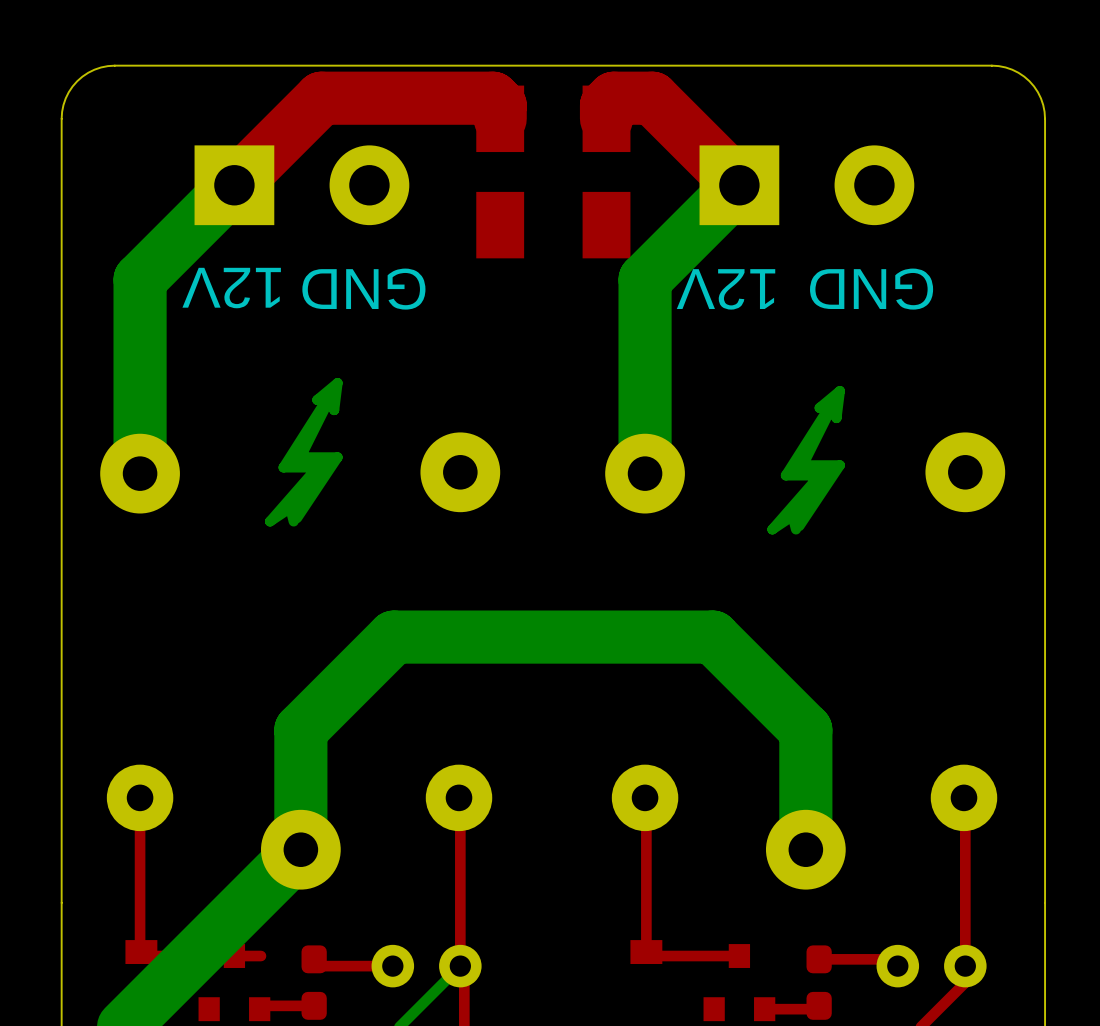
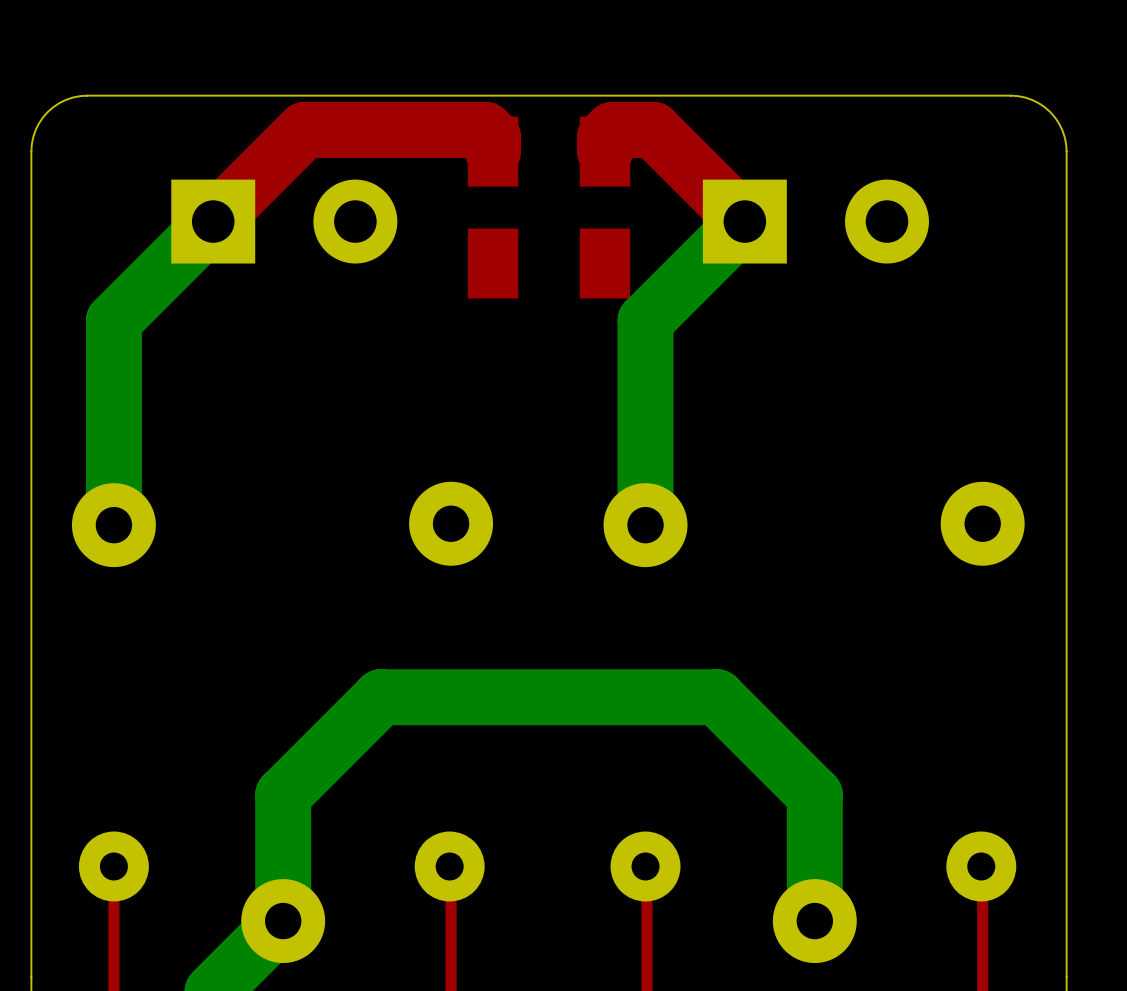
text: 12V (231, 288) -> none
text: GND (363, 289) -> none
text: 12V (726, 289) -> none
text: GND (871, 289) -> none
drawing: [264, 378, 343, 527] -> none
drawing: [767, 385, 845, 535] -> none

